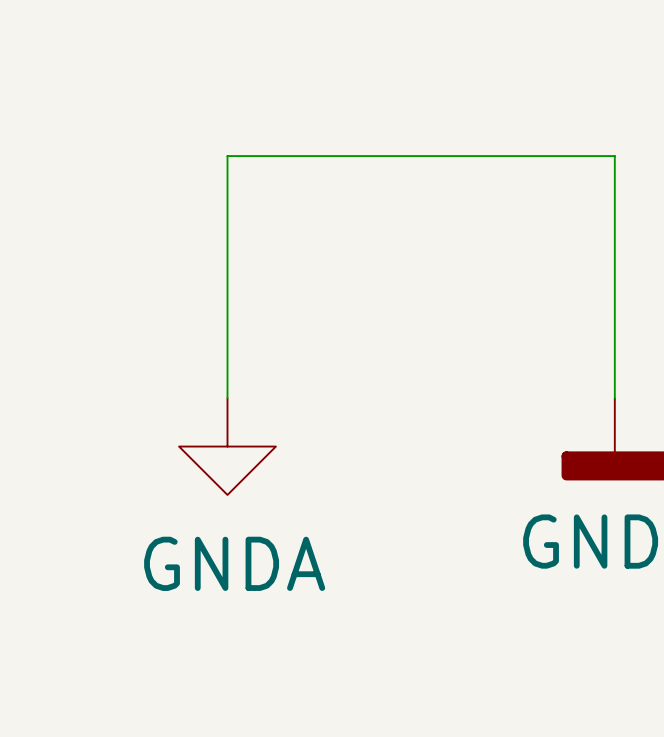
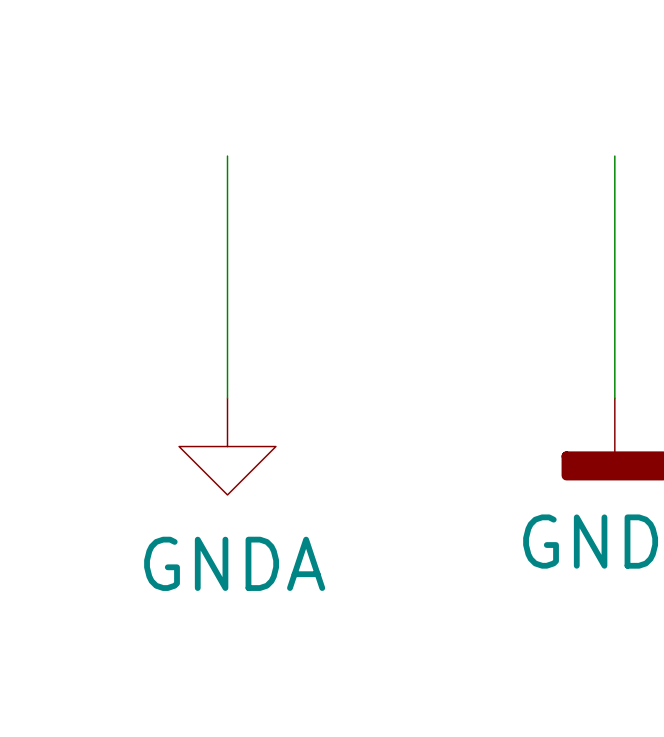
wire: (227, 156) (614, 156) -> none

